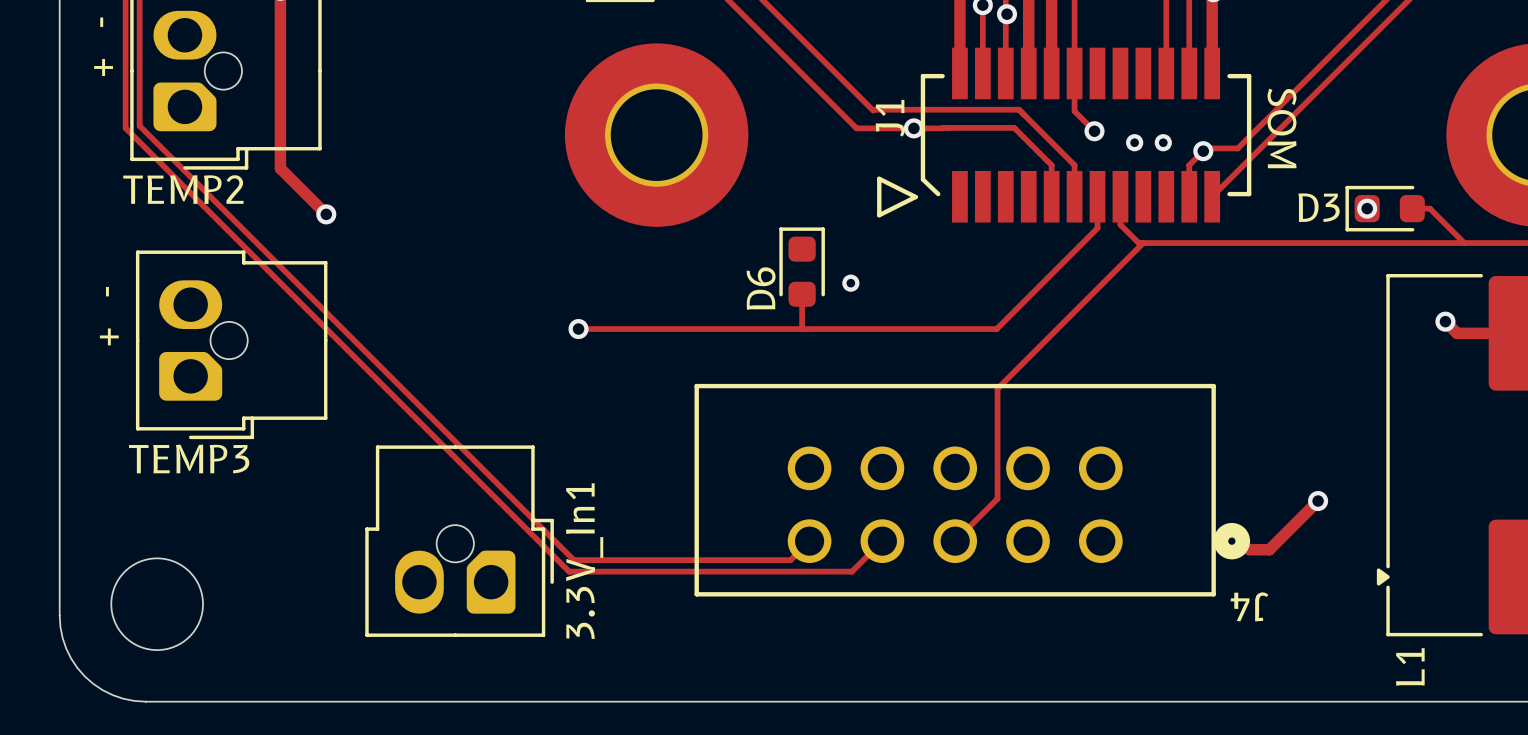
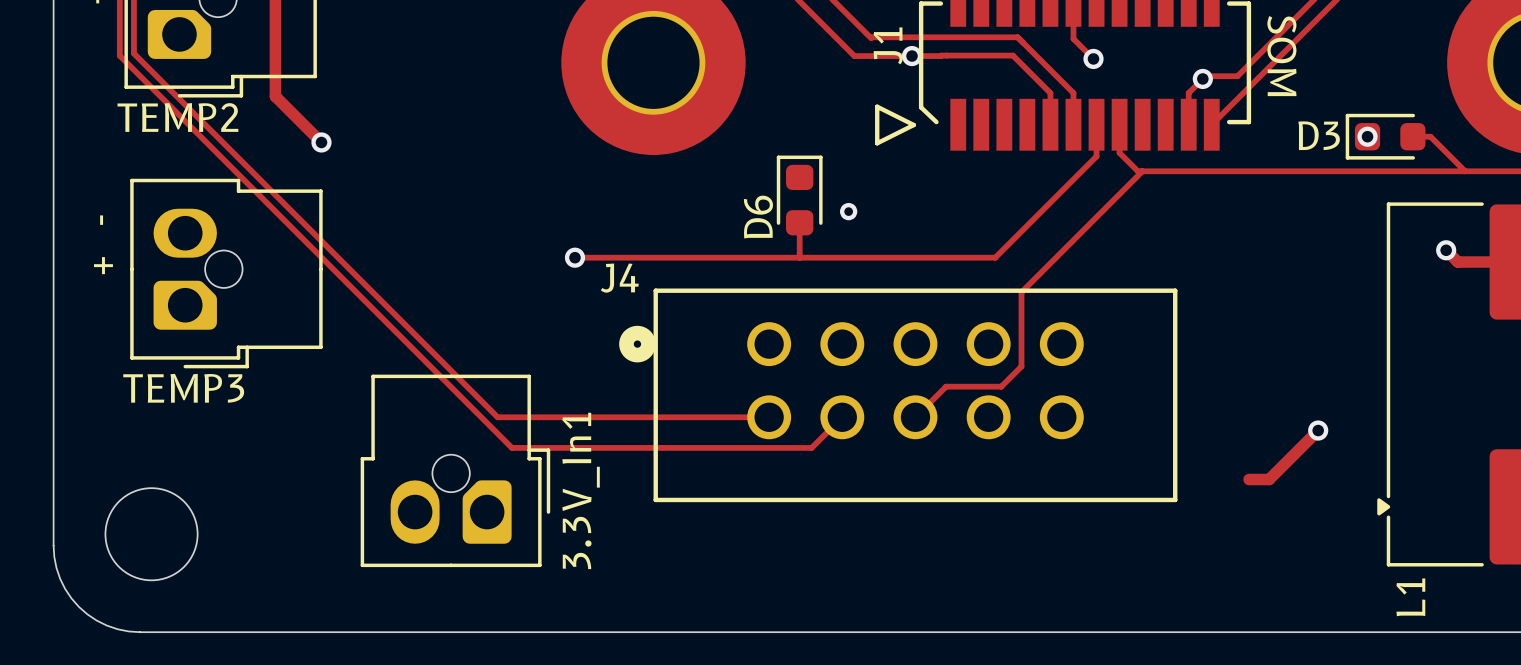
via: (1134, 142) -> none
via: (1163, 142) -> none
track: (1022, 363) (997, 388) (997, 498) (955, 541) -> (1021, 292) (1021, 366) (1001, 386) (946, 386) (915, 417)
track: (501, 487) (573, 560) (790, 560) (809, 541) -> (497, 417) (769, 417)
J4 rotation: 0° (972, 490) -> 180° (898, 395)
track: (515, 518) (569, 571) (851, 571) (882, 541) -> (511, 447) (811, 447) (842, 417)

